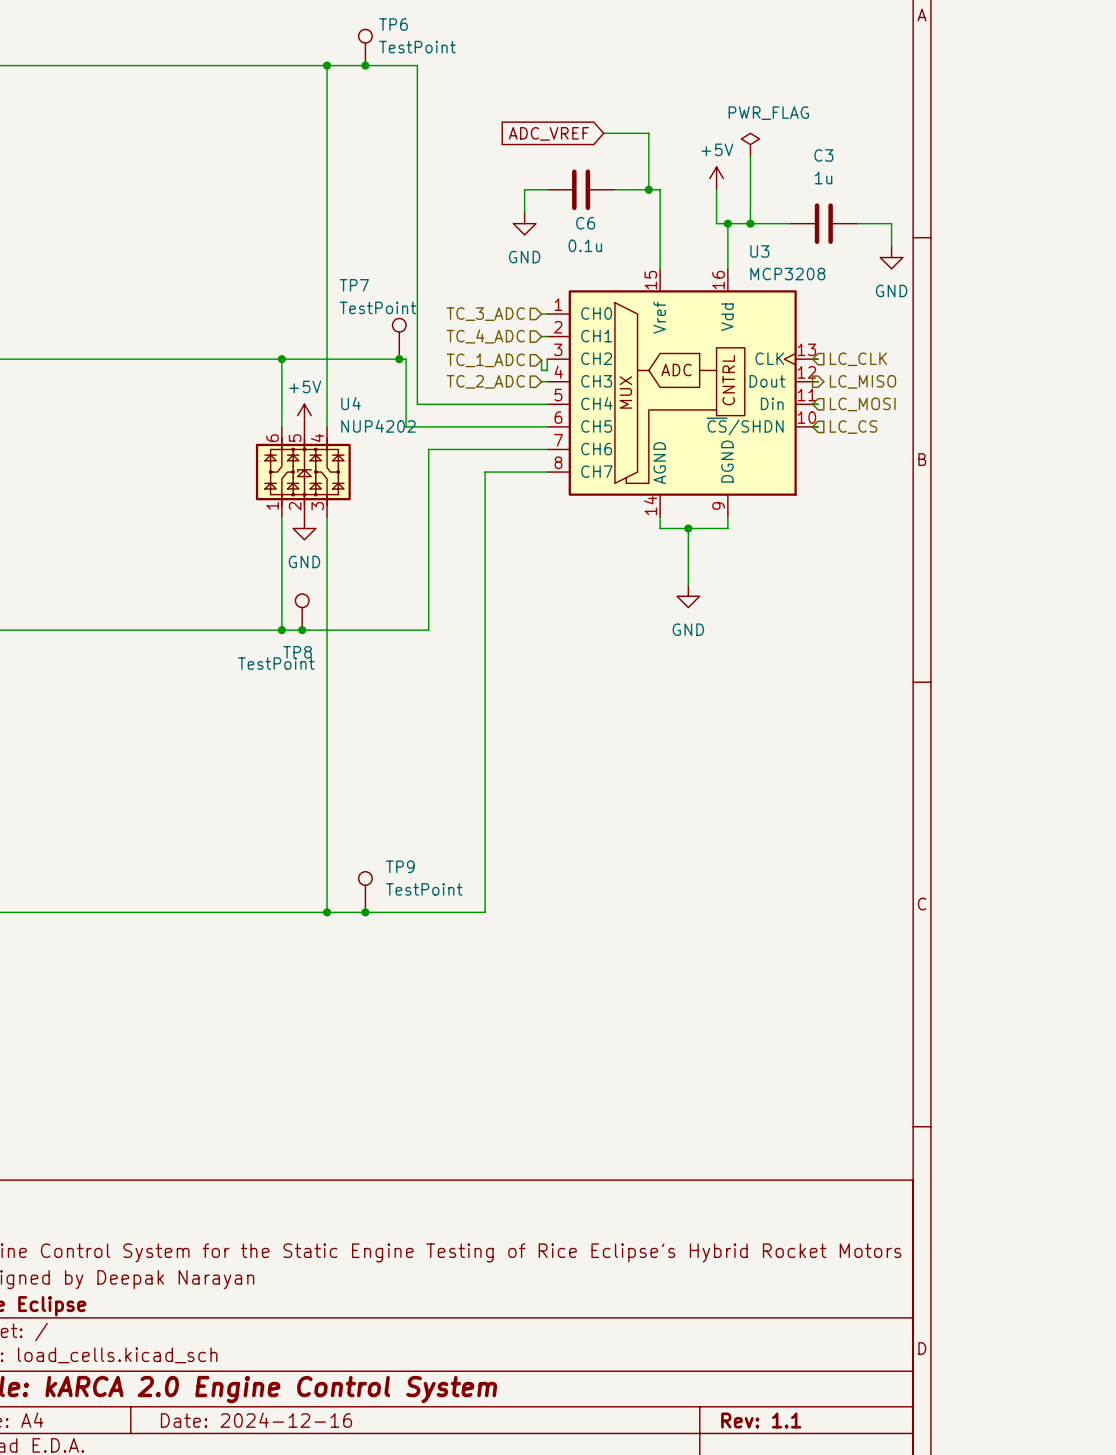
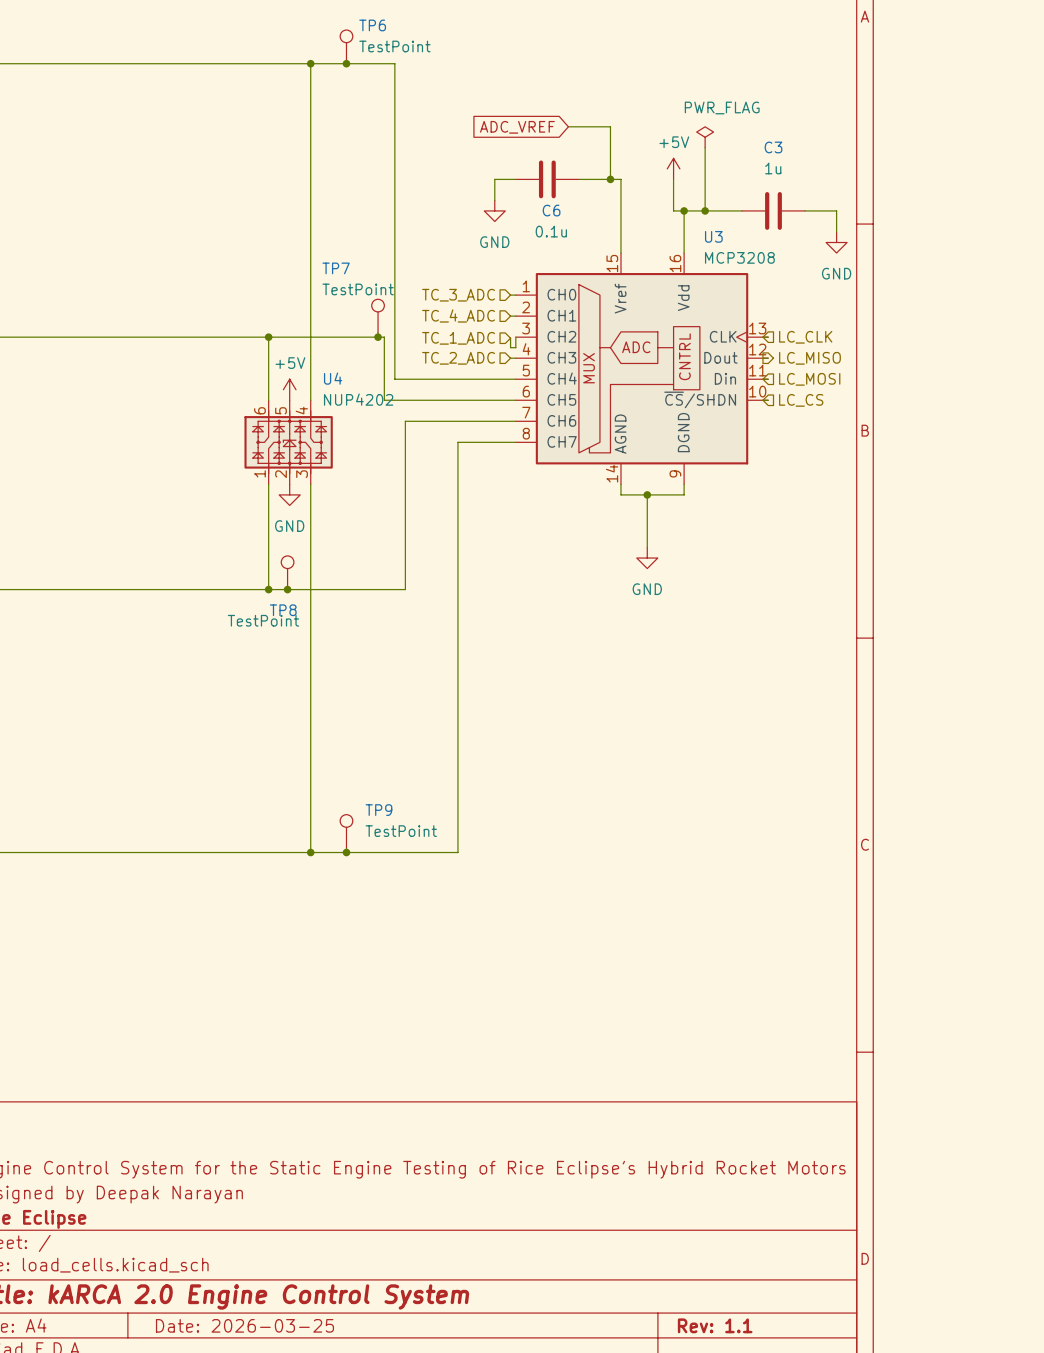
title block: Date: 2024-12-16 (256, 1420) -> Date: 2026-03-25 (244, 1325)

